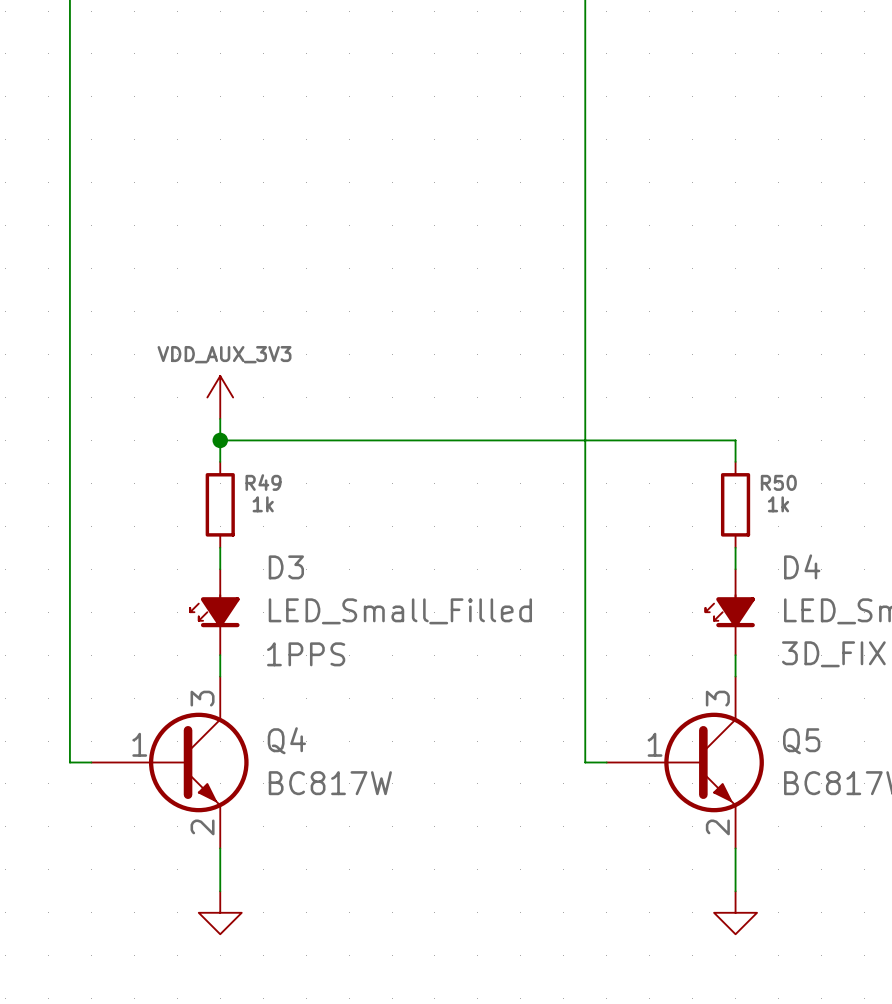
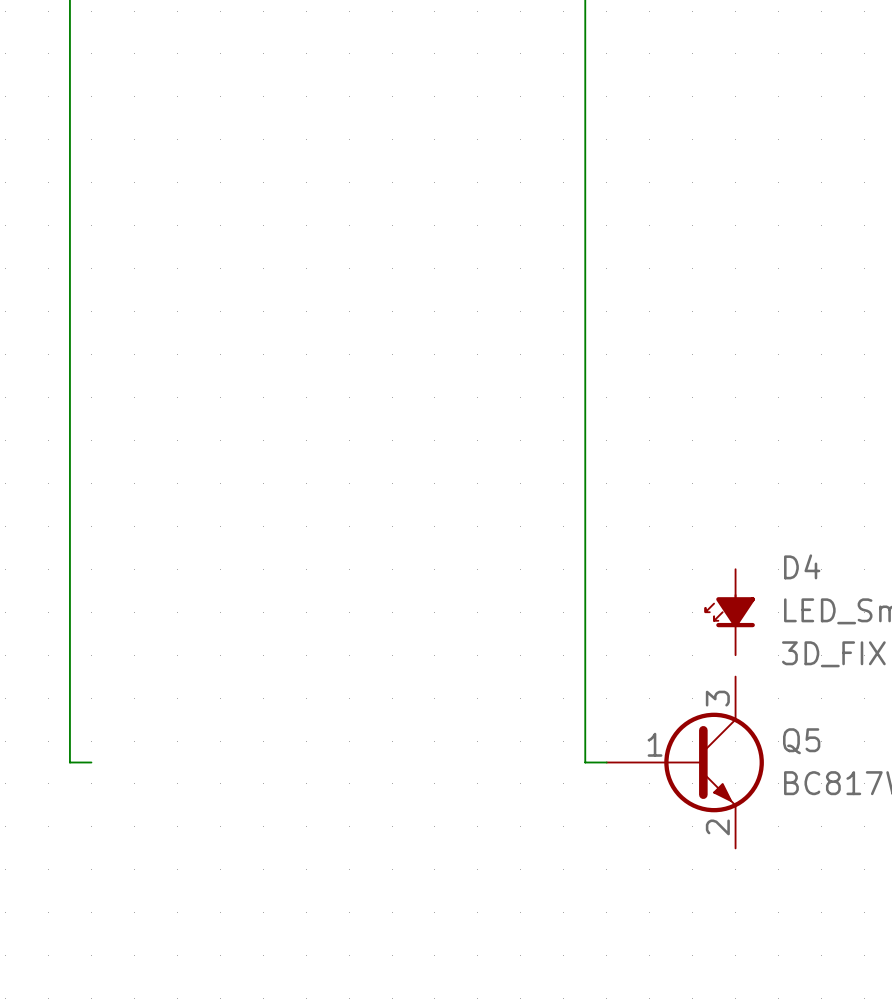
power symbol: VDD_AUX_3V3 (220, 397) -> none
wire: (220, 418) (220, 461) -> none
wire: (220, 440) (735, 440) (735, 461) -> none
junction: (220, 440) -> none
R49: 1k (220, 504) -> none
R50: 1k (735, 504) -> none
wire: (220, 547) (220, 569) -> none
wire: (735, 547) (735, 569) -> none
D3: LED_Small_Filled (214, 612) -> none
wire: (220, 655) (220, 676) -> none
wire: (735, 655) (735, 676) -> none
Q4: BC817W (170, 762) -> none
wire: (220, 848) (220, 891) -> none
wire: (735, 848) (735, 891) -> none
power symbol: (220, 912) -> none
power symbol: (735, 912) -> none

